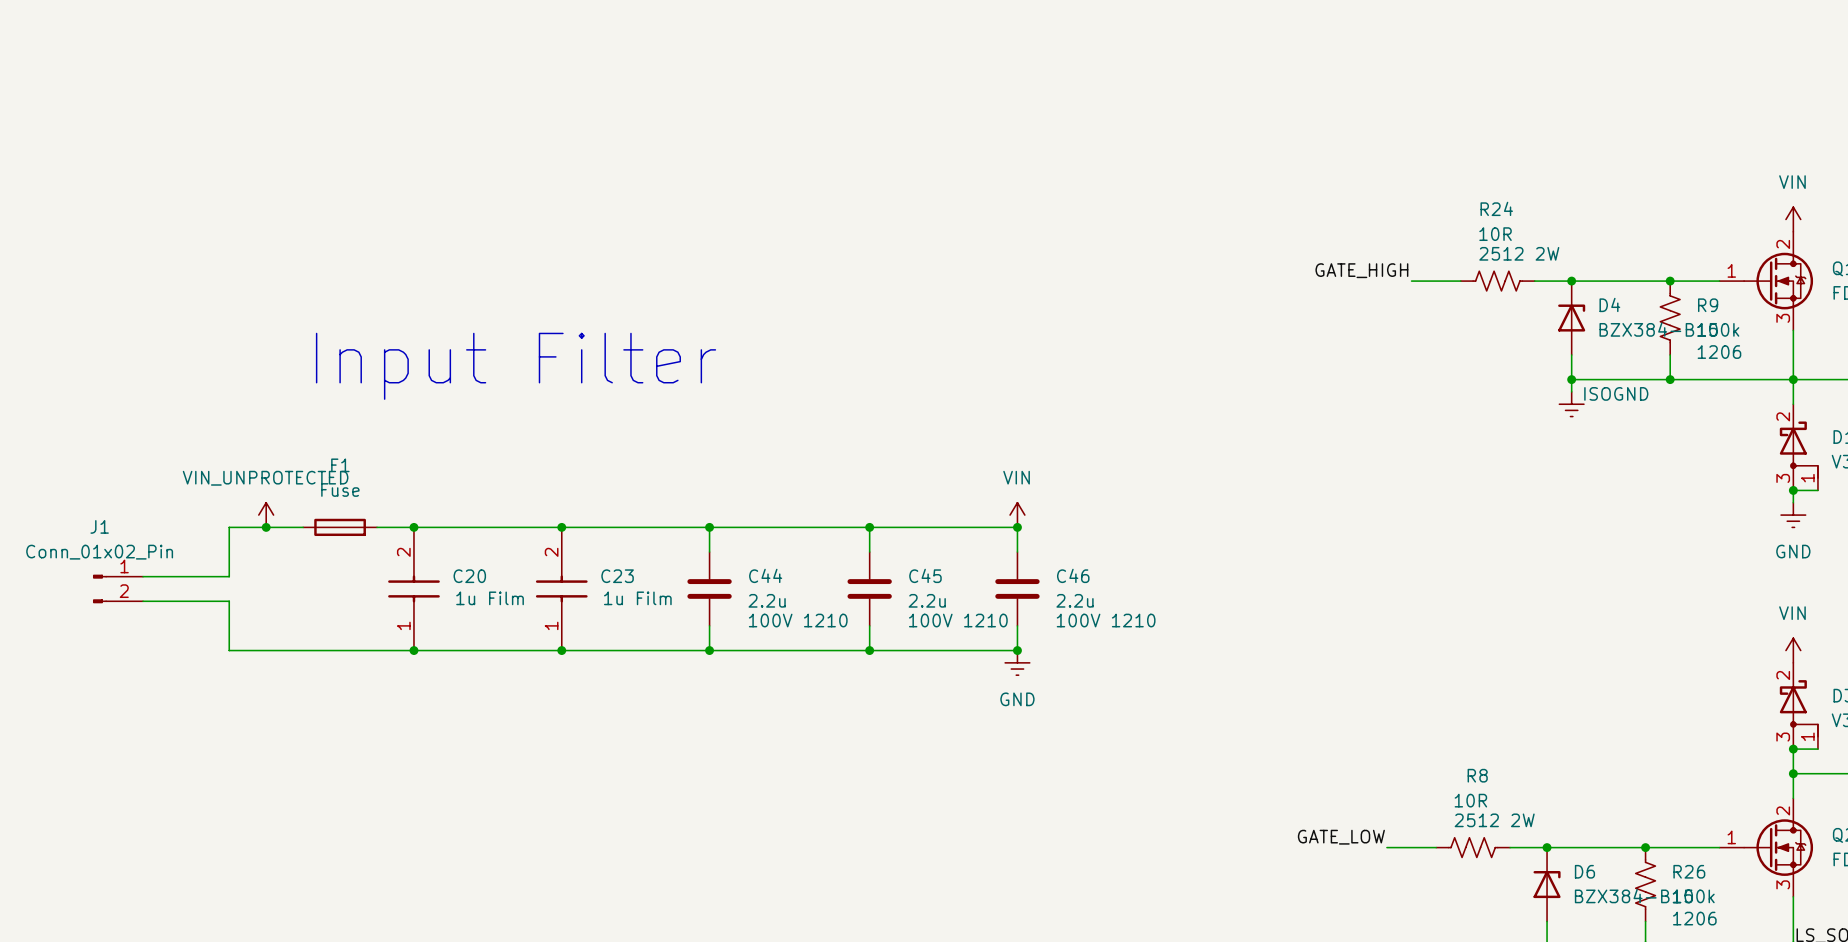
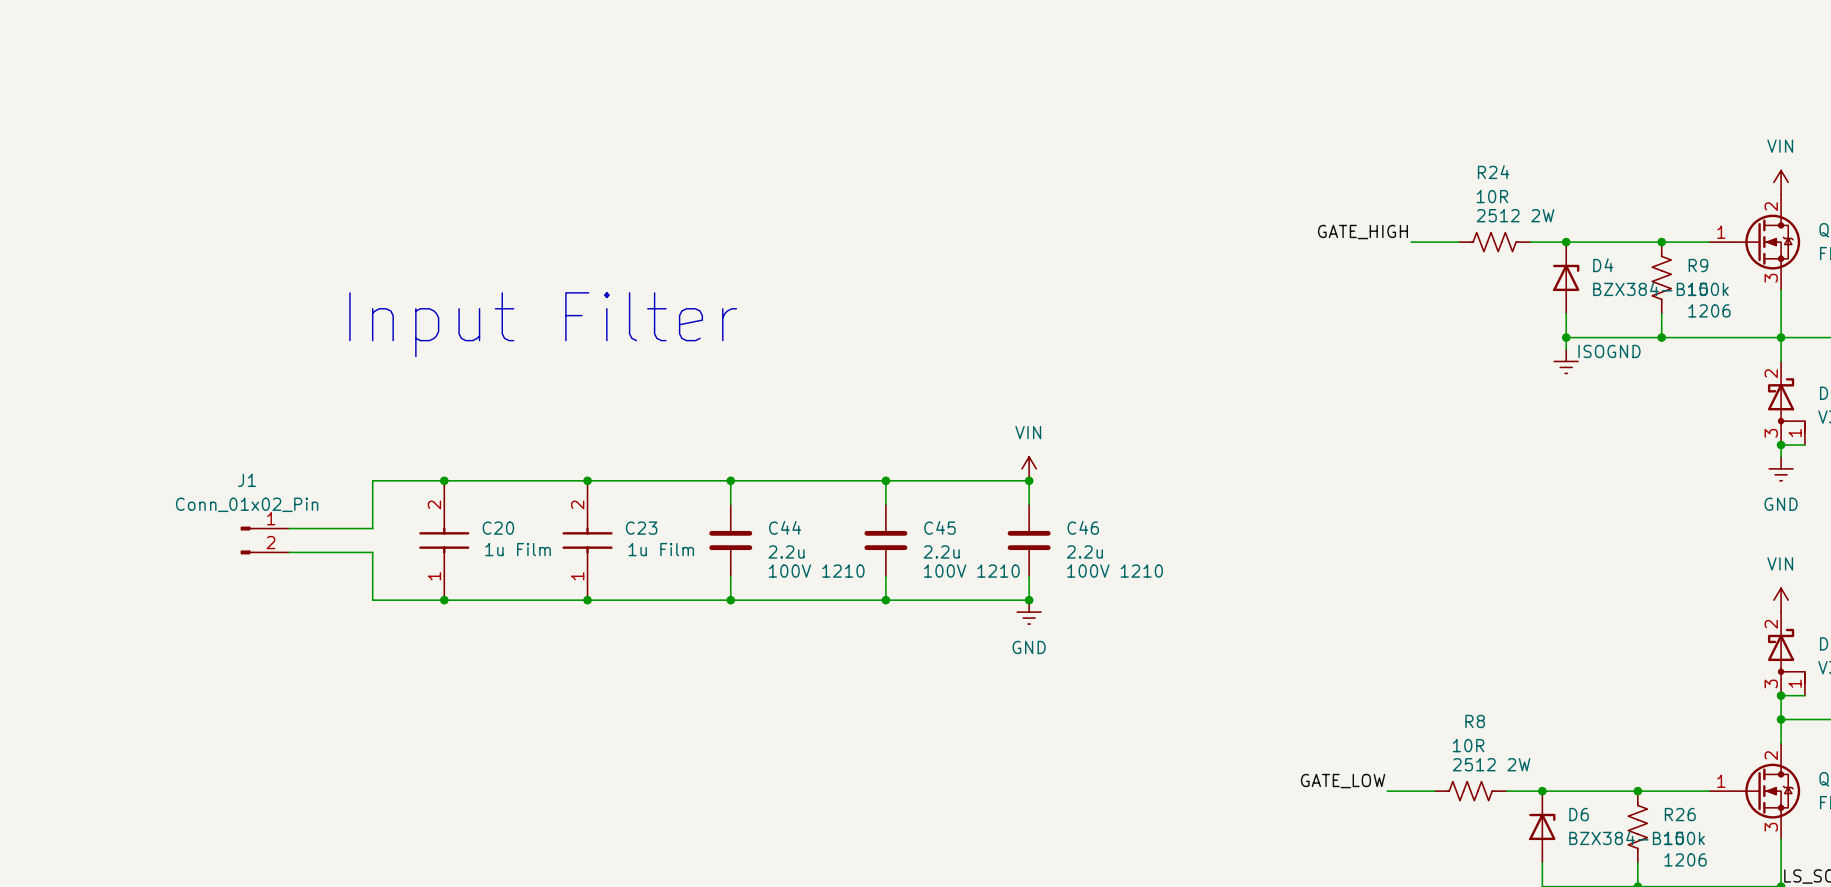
power symbol: VIN_UNPROTECTED (266, 515) -> none
junction: (266, 527) -> none
wire: (303, 527) (229, 527) (229, 576) (143, 576) -> none
F1: Fuse (340, 527) -> none
wire: none -> (408, 480) (372, 480) (372, 528) (289, 528)
J1 position: (118, 588) -> (264, 540)
wire: (143, 601) (229, 601) (229, 650) (340, 650) -> (289, 552) (372, 552) (372, 600)

